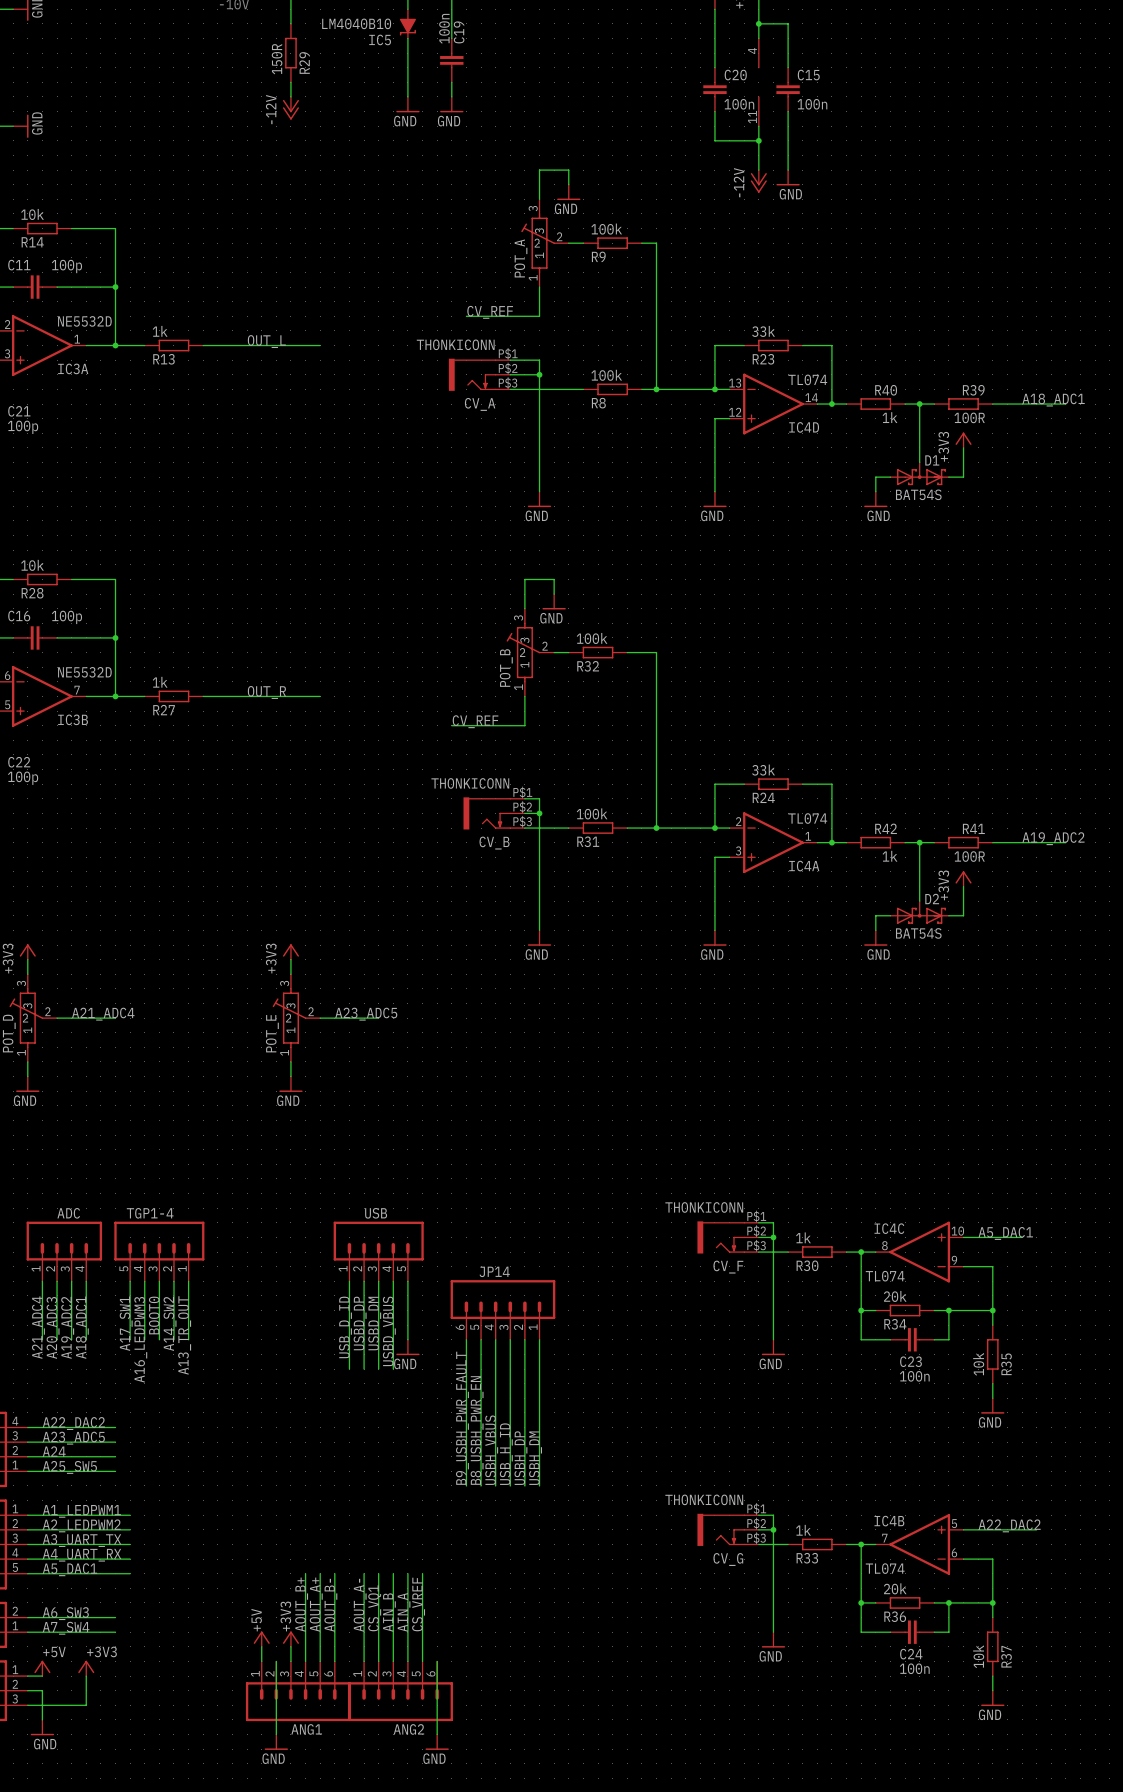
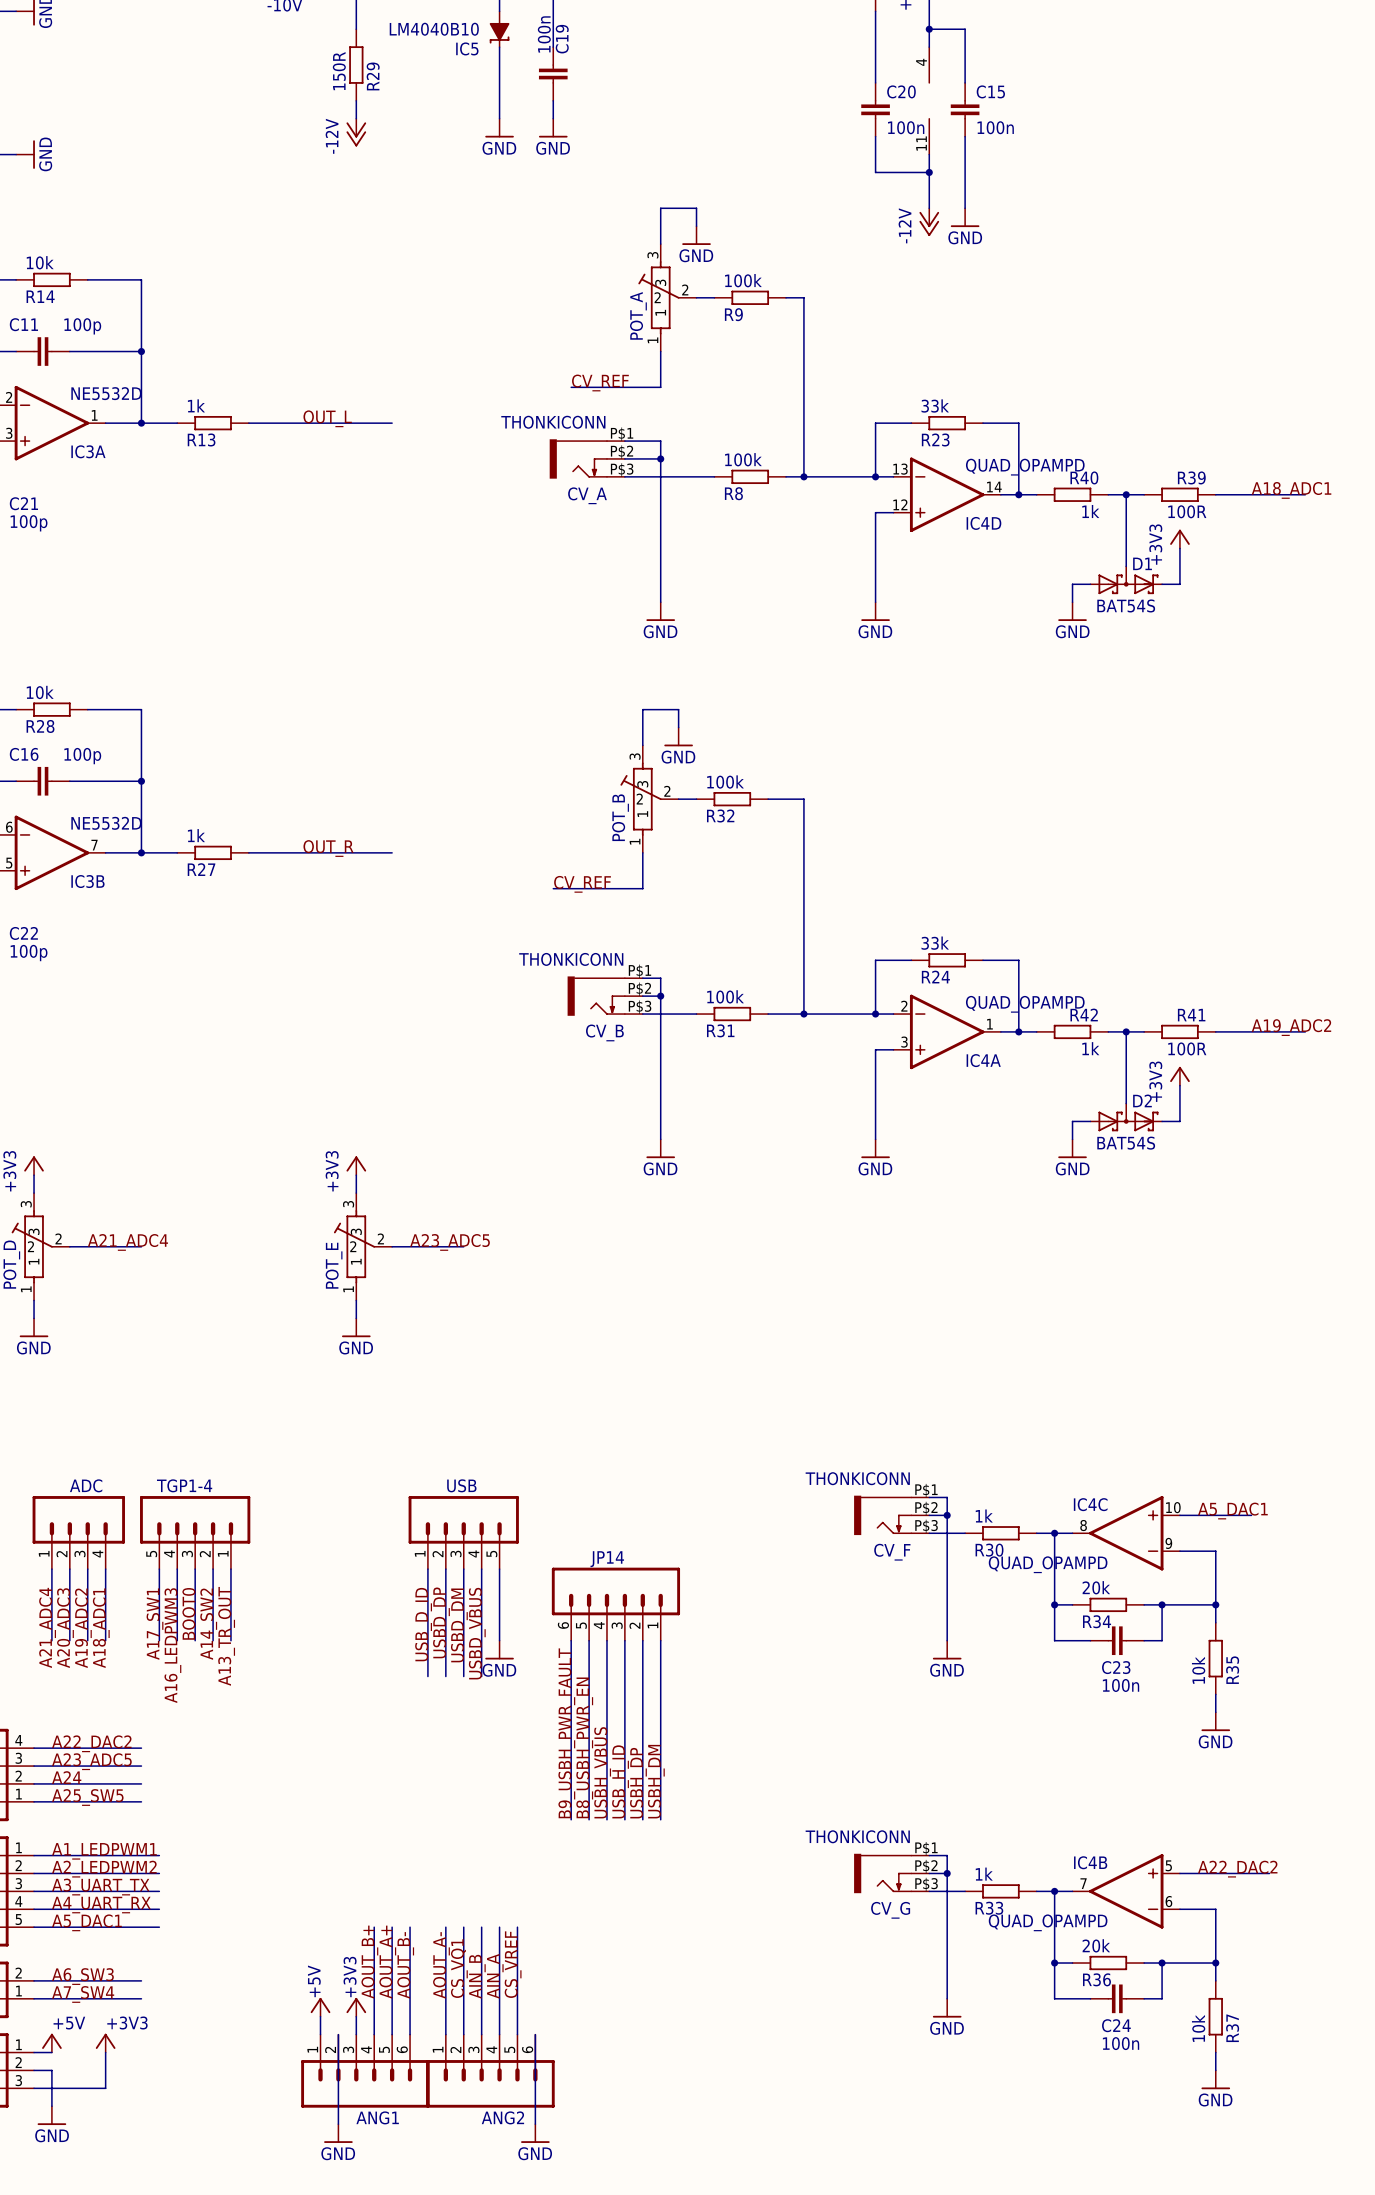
IC4D value: TL074 (807, 379) -> QUAD_OPAMPD (1025, 467)
IC4A value: TL074 (807, 818) -> QUAD_OPAMPD (1025, 1004)
IC4C value: TL074 (885, 1276) -> QUAD_OPAMPD (1048, 1564)
IC4B value: TL074 (885, 1568) -> QUAD_OPAMPD (1048, 1922)

